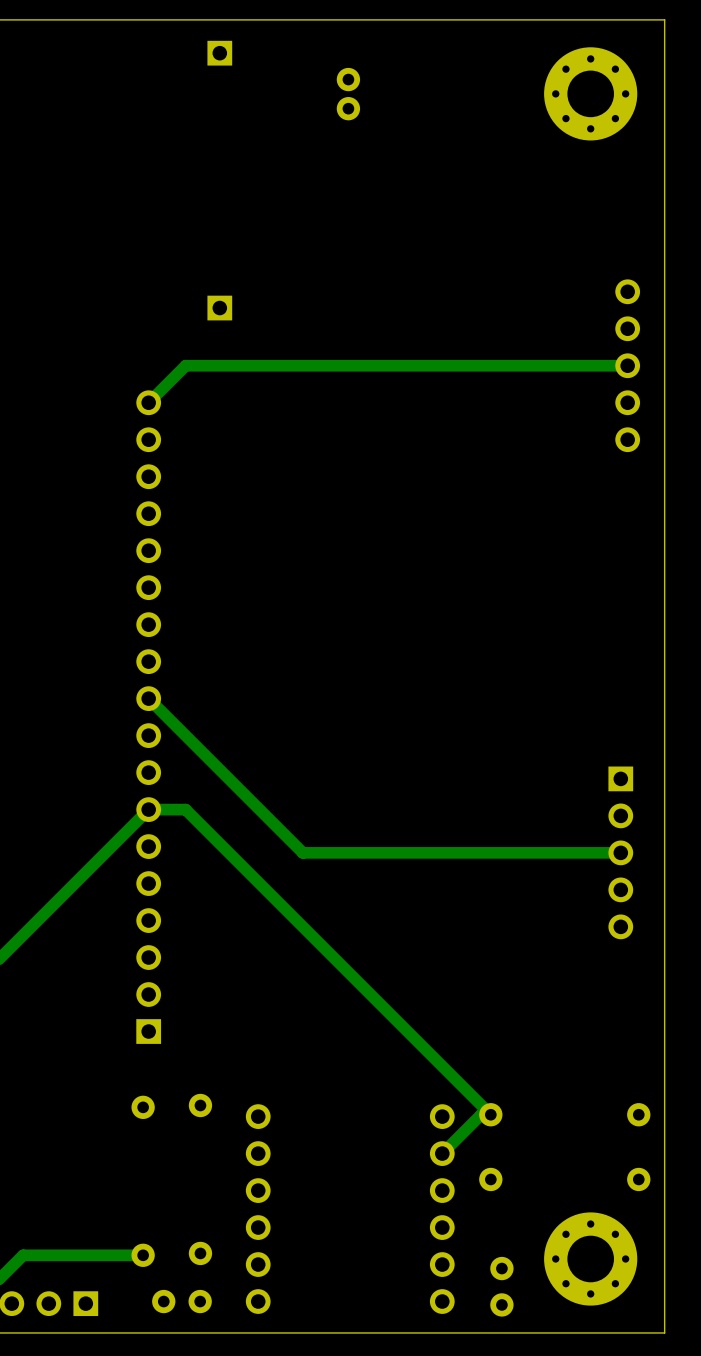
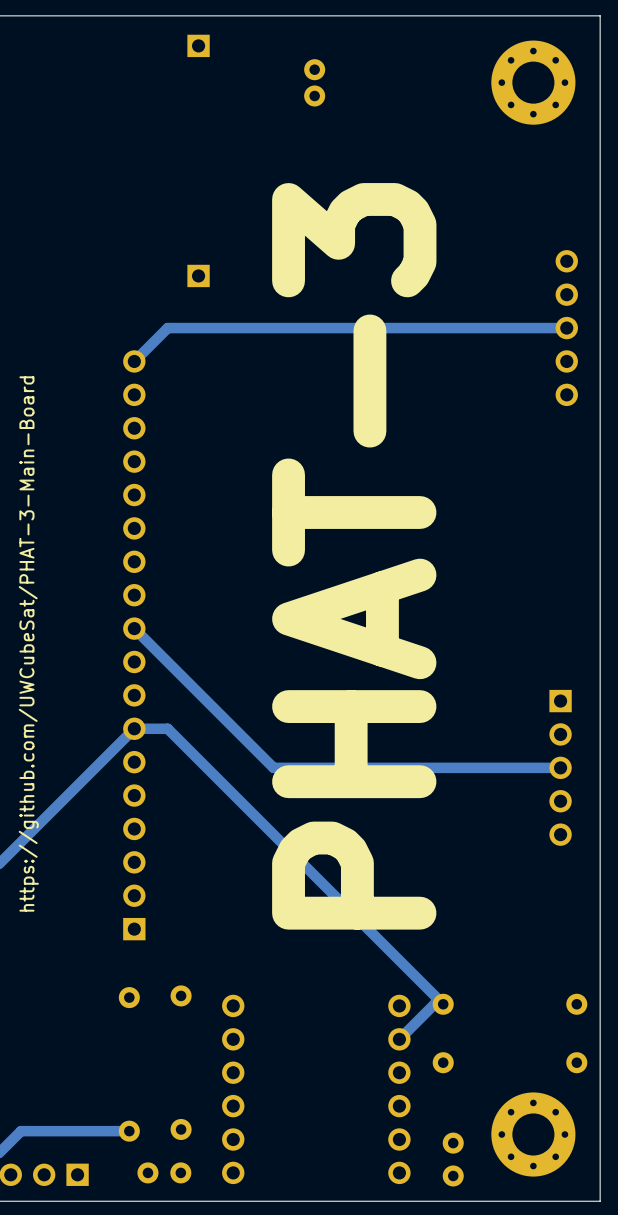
text: none -> PHAT-3 (354, 556)
text: none -> https://github.com/UWCubeSat/PHAT-3-Main-Board (28, 643)

